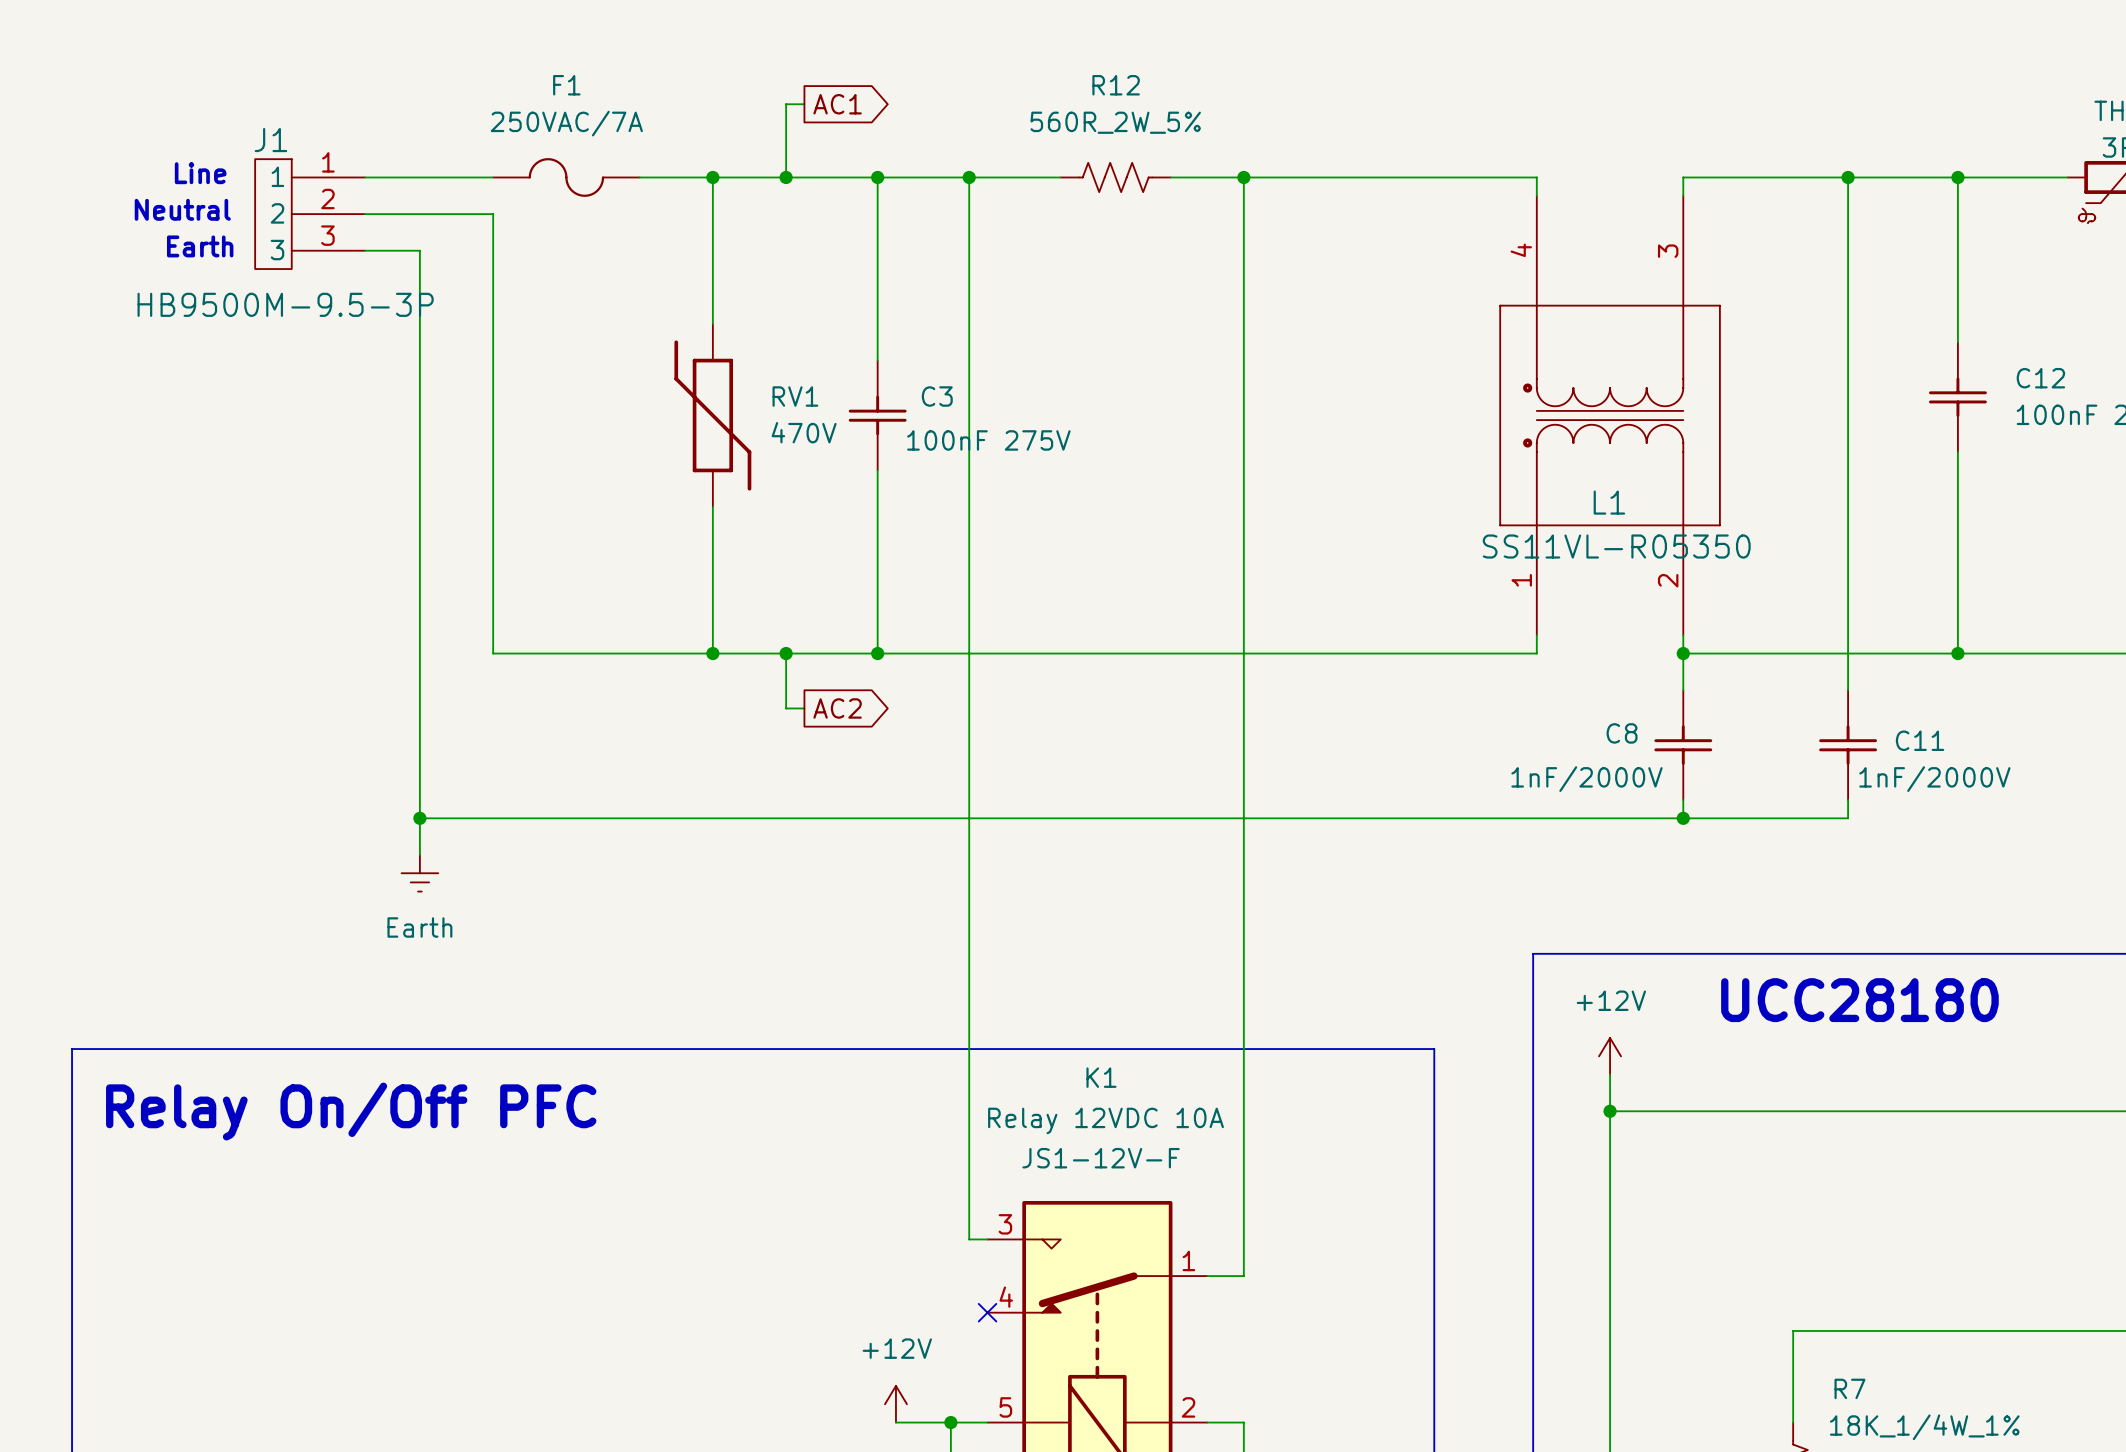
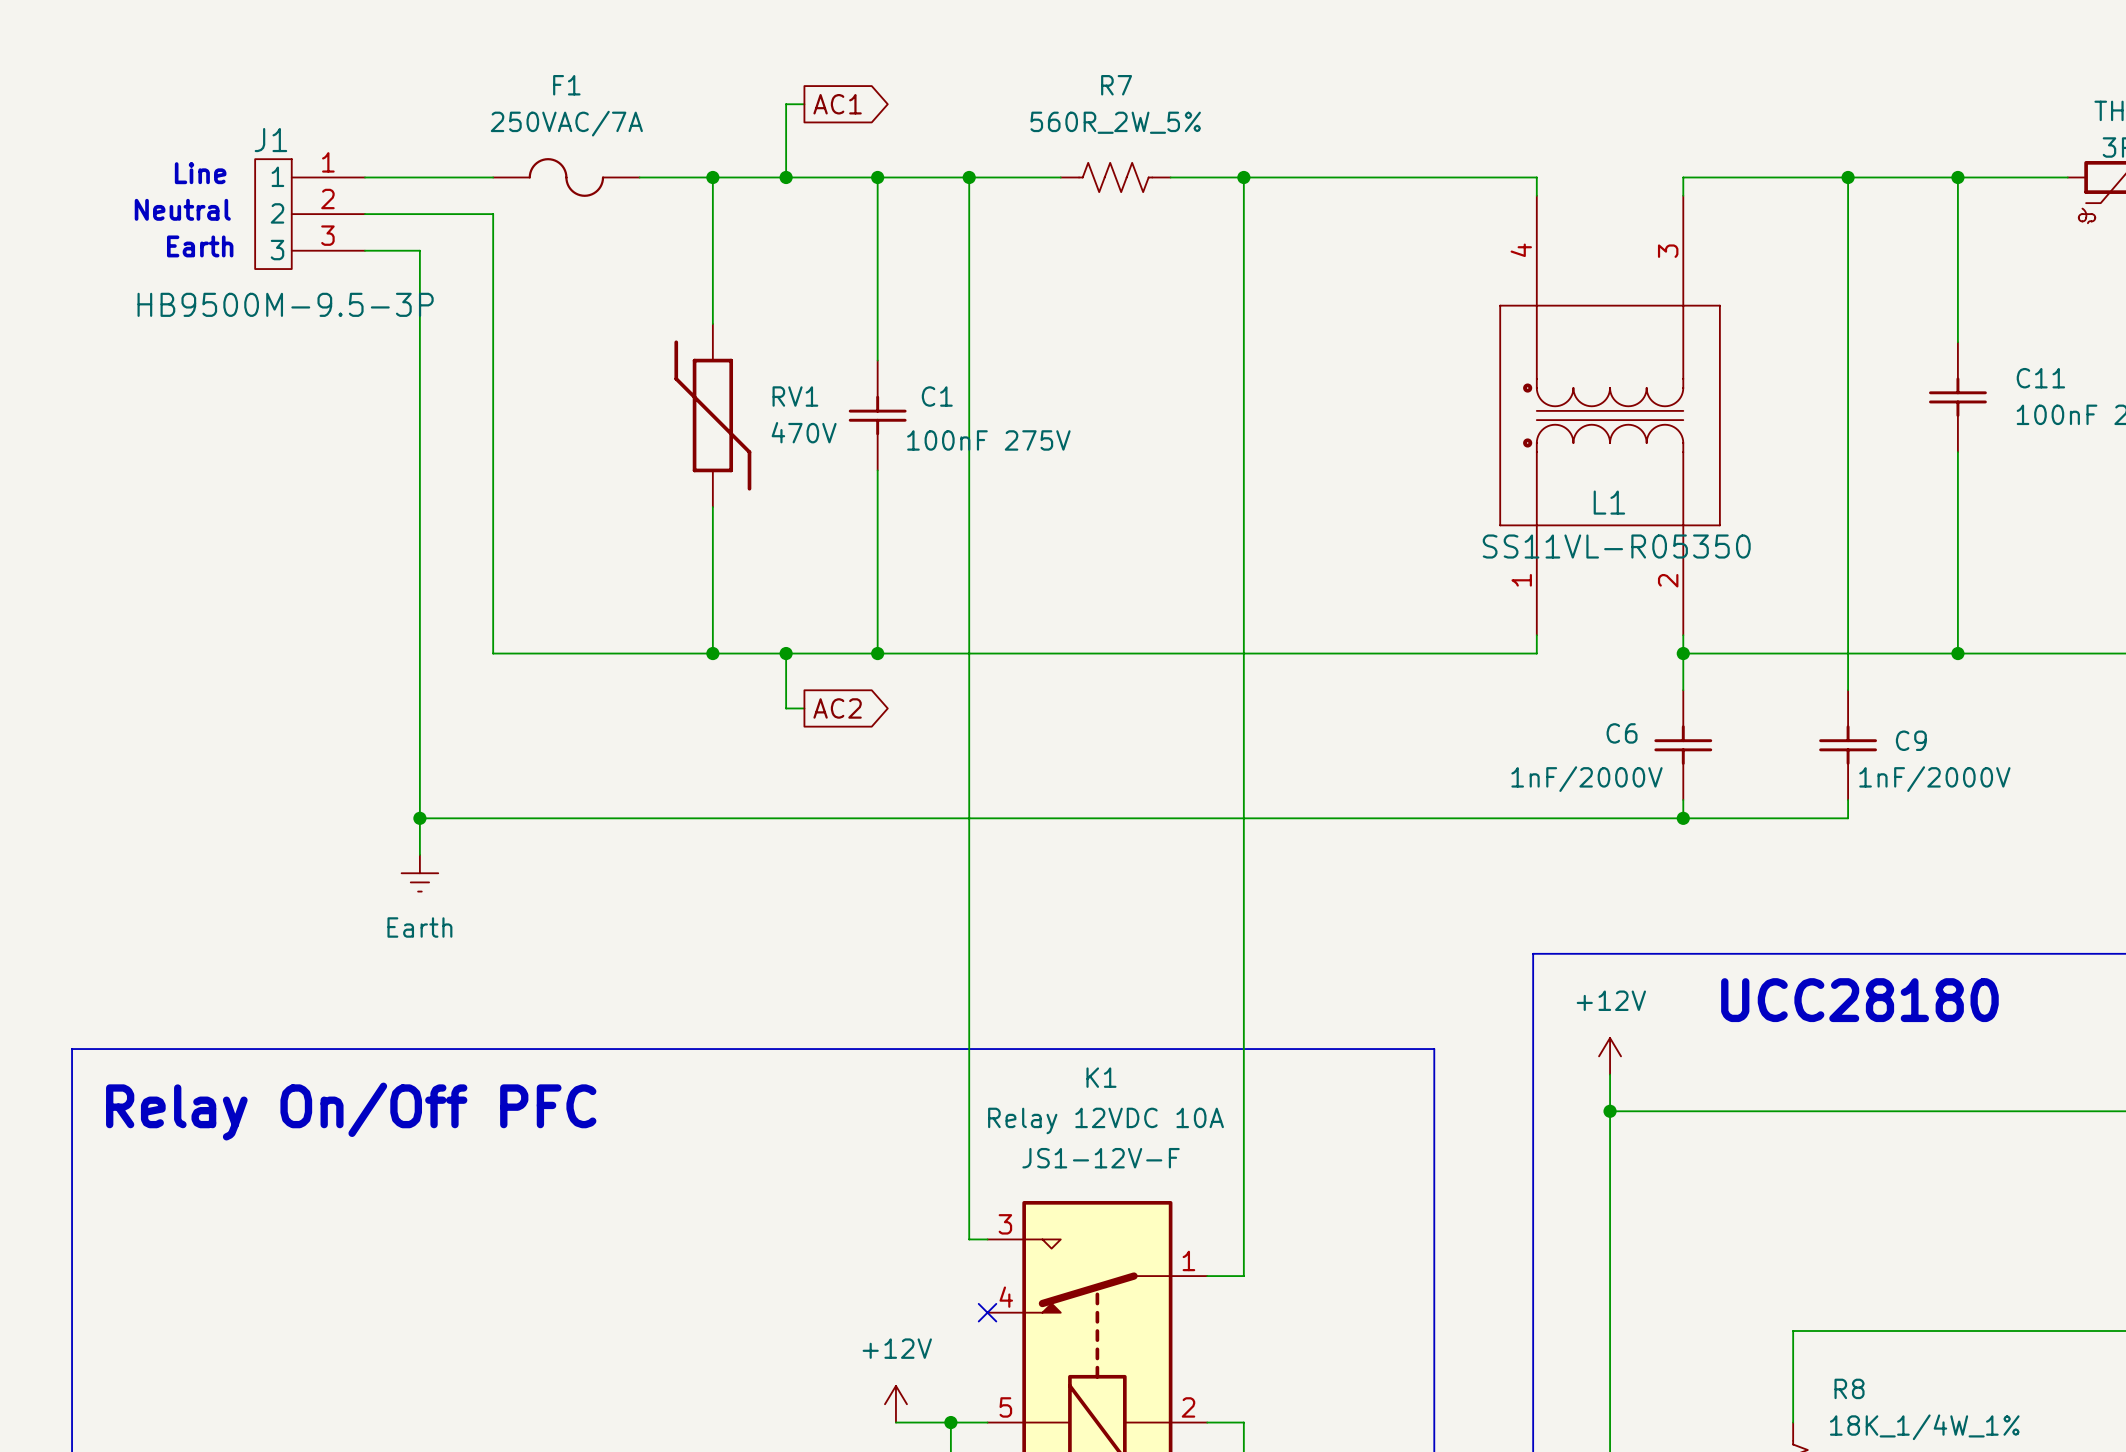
R12 name: R12 (1116, 85) -> R7 (1116, 85)
C12 name: C12 (2040, 378) -> C11 (2040, 378)
C3 name: C3 (937, 396) -> C1 (937, 396)
C8 name: C8 (1622, 733) -> C6 (1622, 733)
C11 name: C11 (1920, 740) -> C9 (1911, 740)
R7 name: R7 (1849, 1388) -> R8 (1849, 1388)

